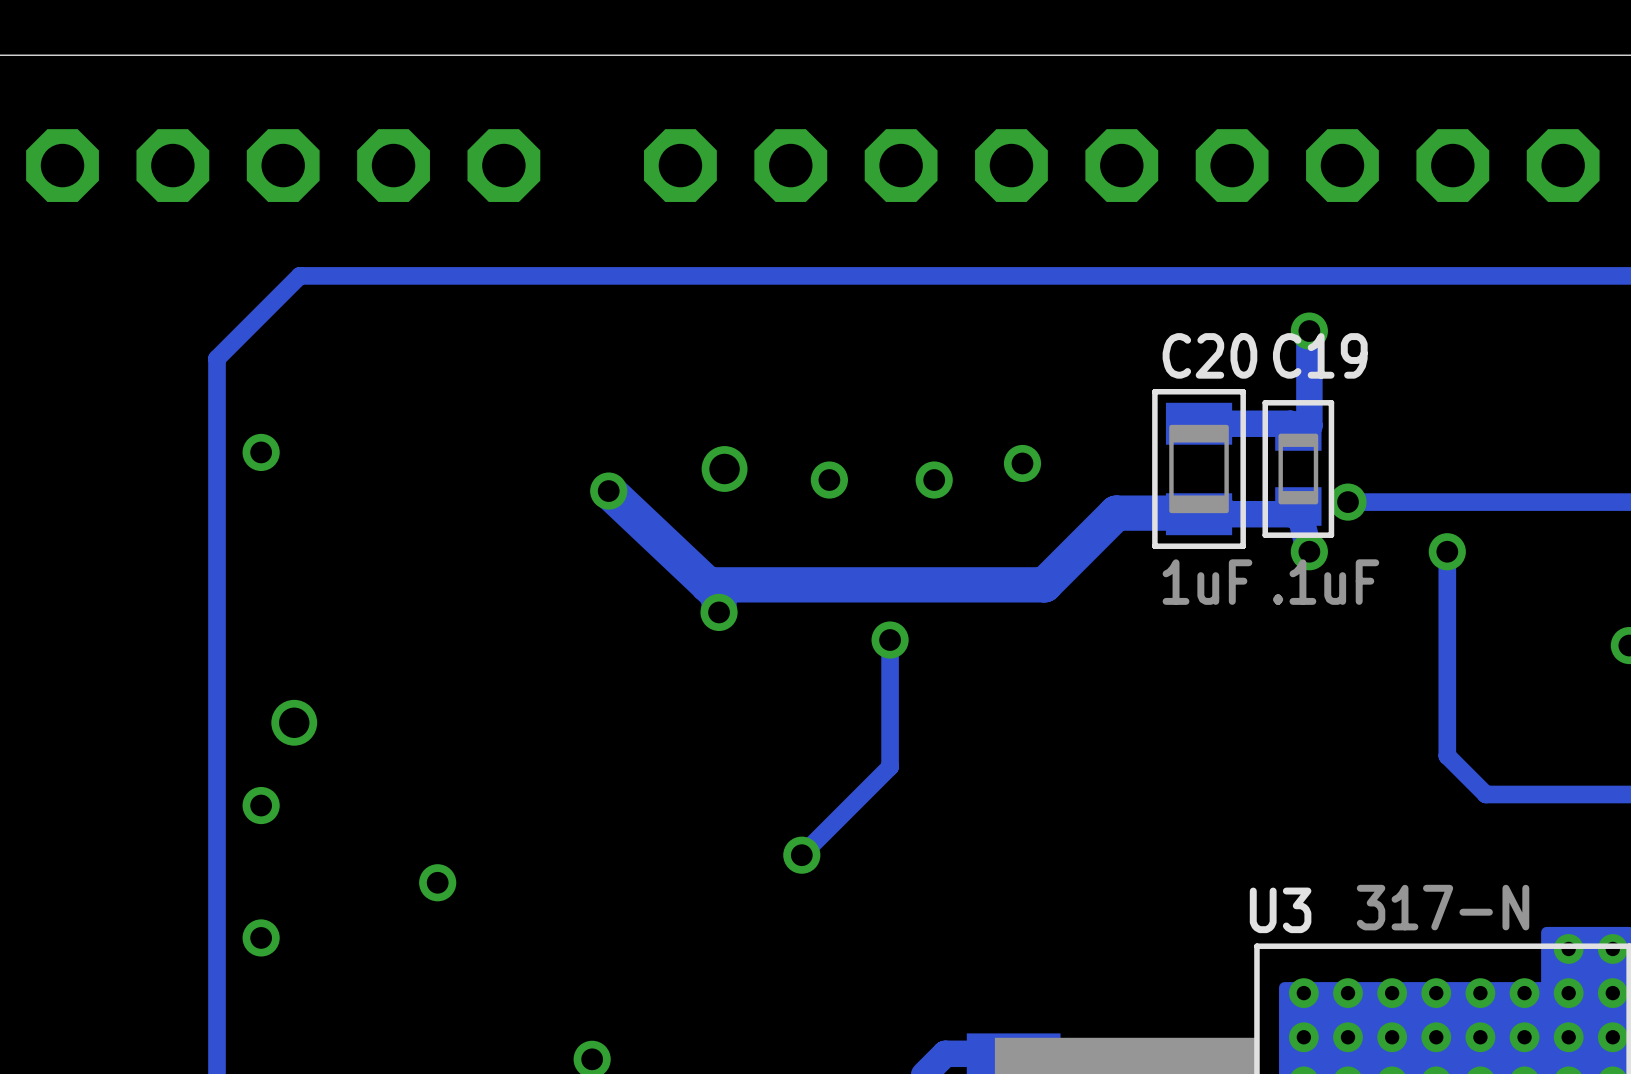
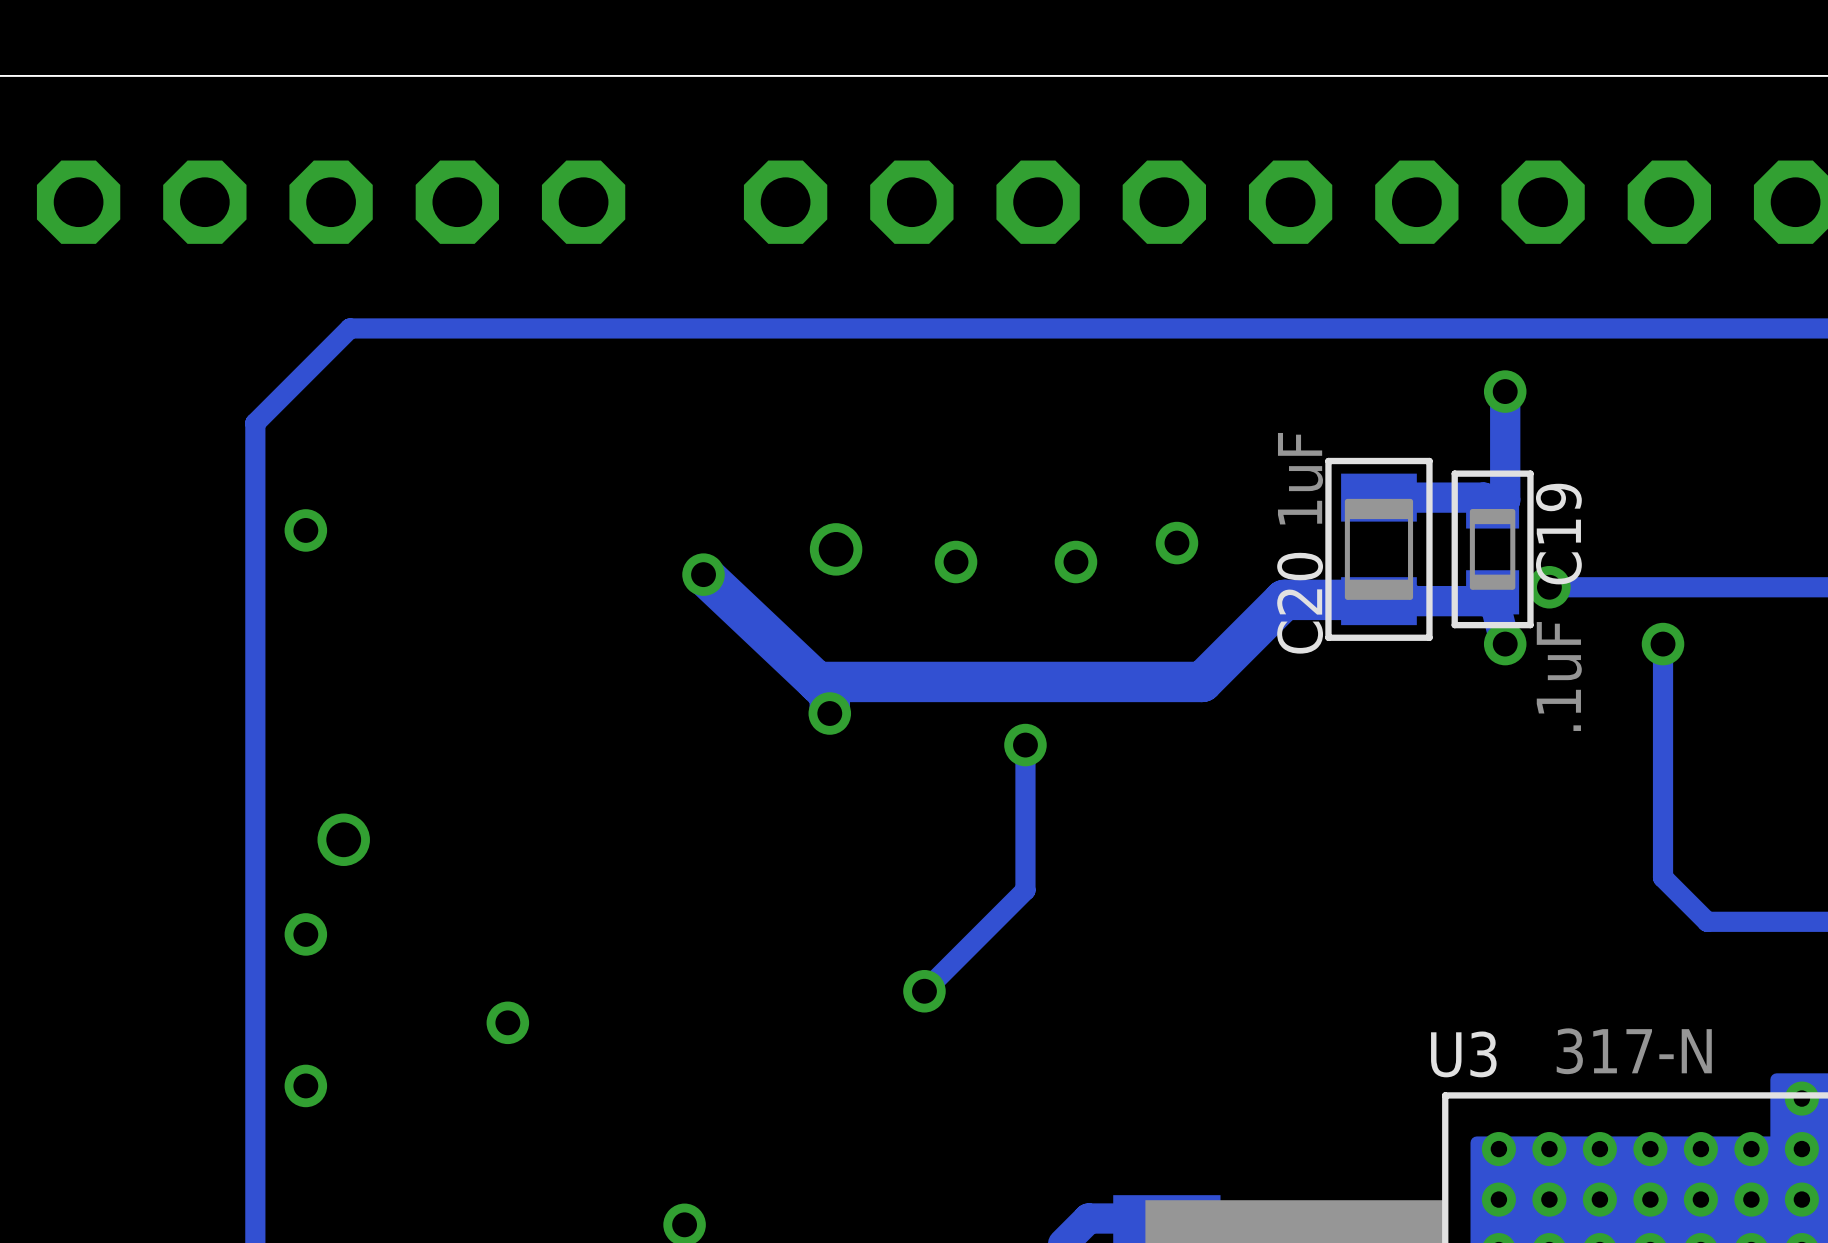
C20 name rotation: 0° (1209, 355) -> 90° counterclockwise (1300, 603)
C20 name position: C20 (1209, 355) -> C20 (1300, 603)
C19 name rotation: 0° (1320, 355) -> 90° counterclockwise (1558, 534)
C20 value rotation: 0° (1207, 582) -> 90° counterclockwise (1300, 478)
C20 value position: 1uF (1207, 582) -> 1uF (1300, 478)
C19 value rotation: 0° (1326, 582) -> 90° counterclockwise (1559, 676)

